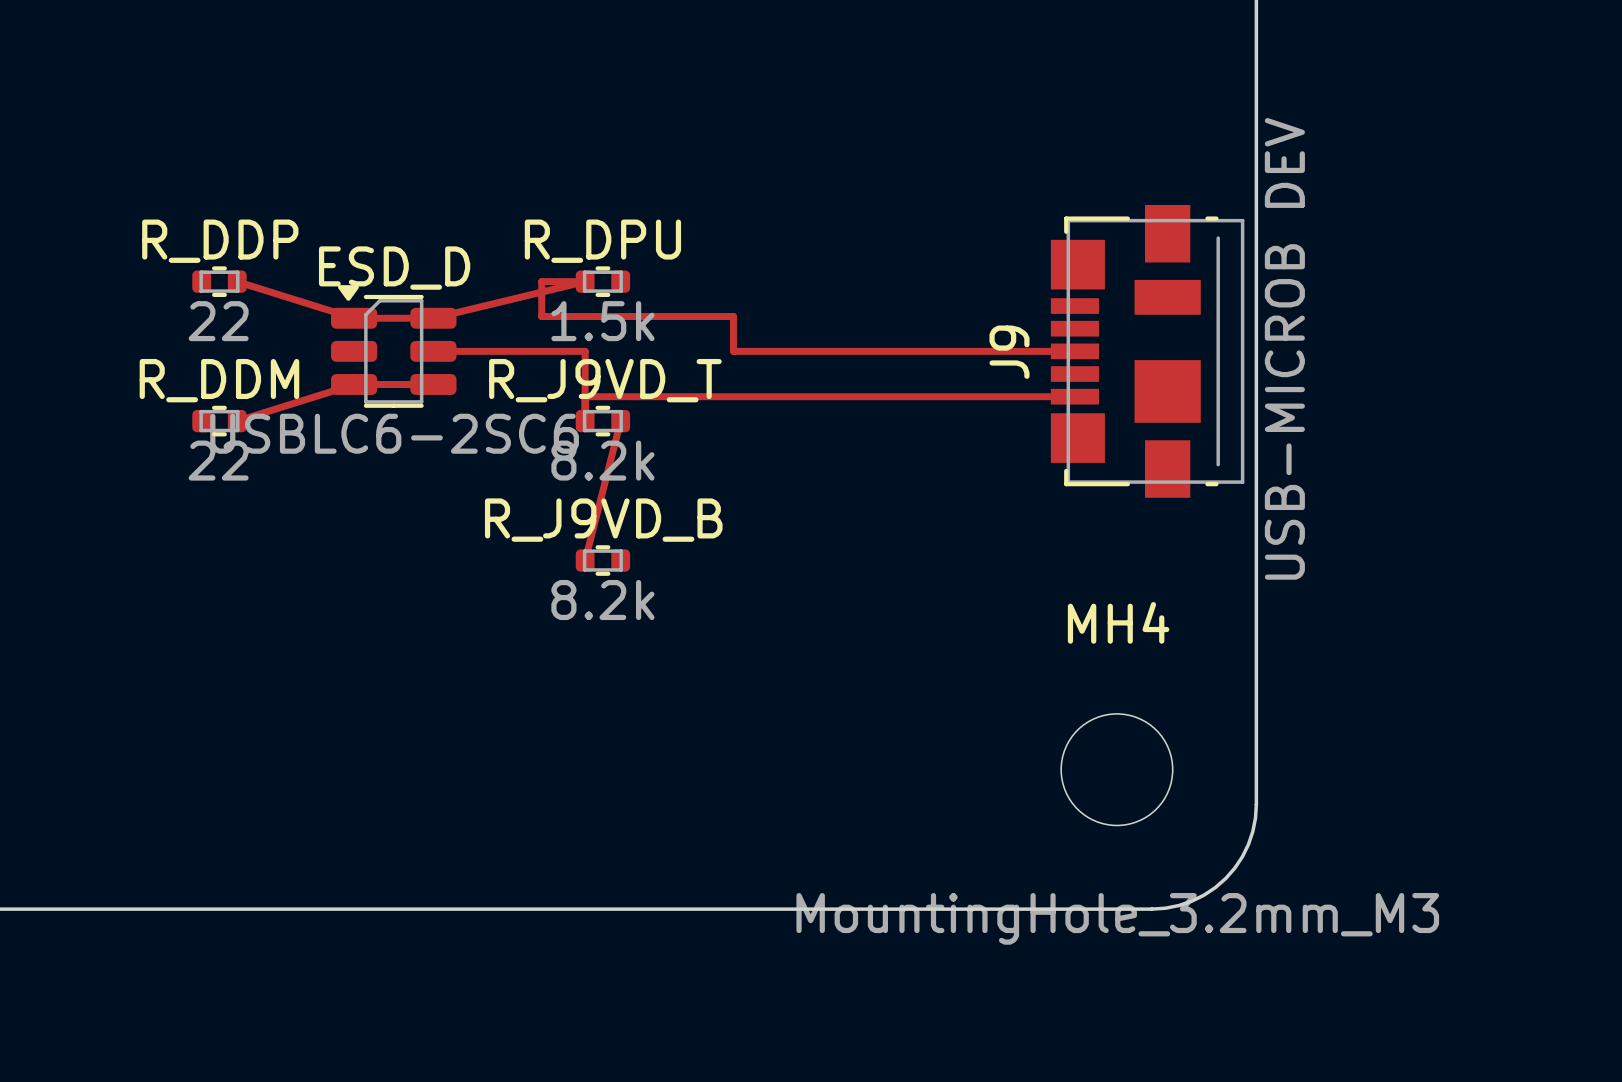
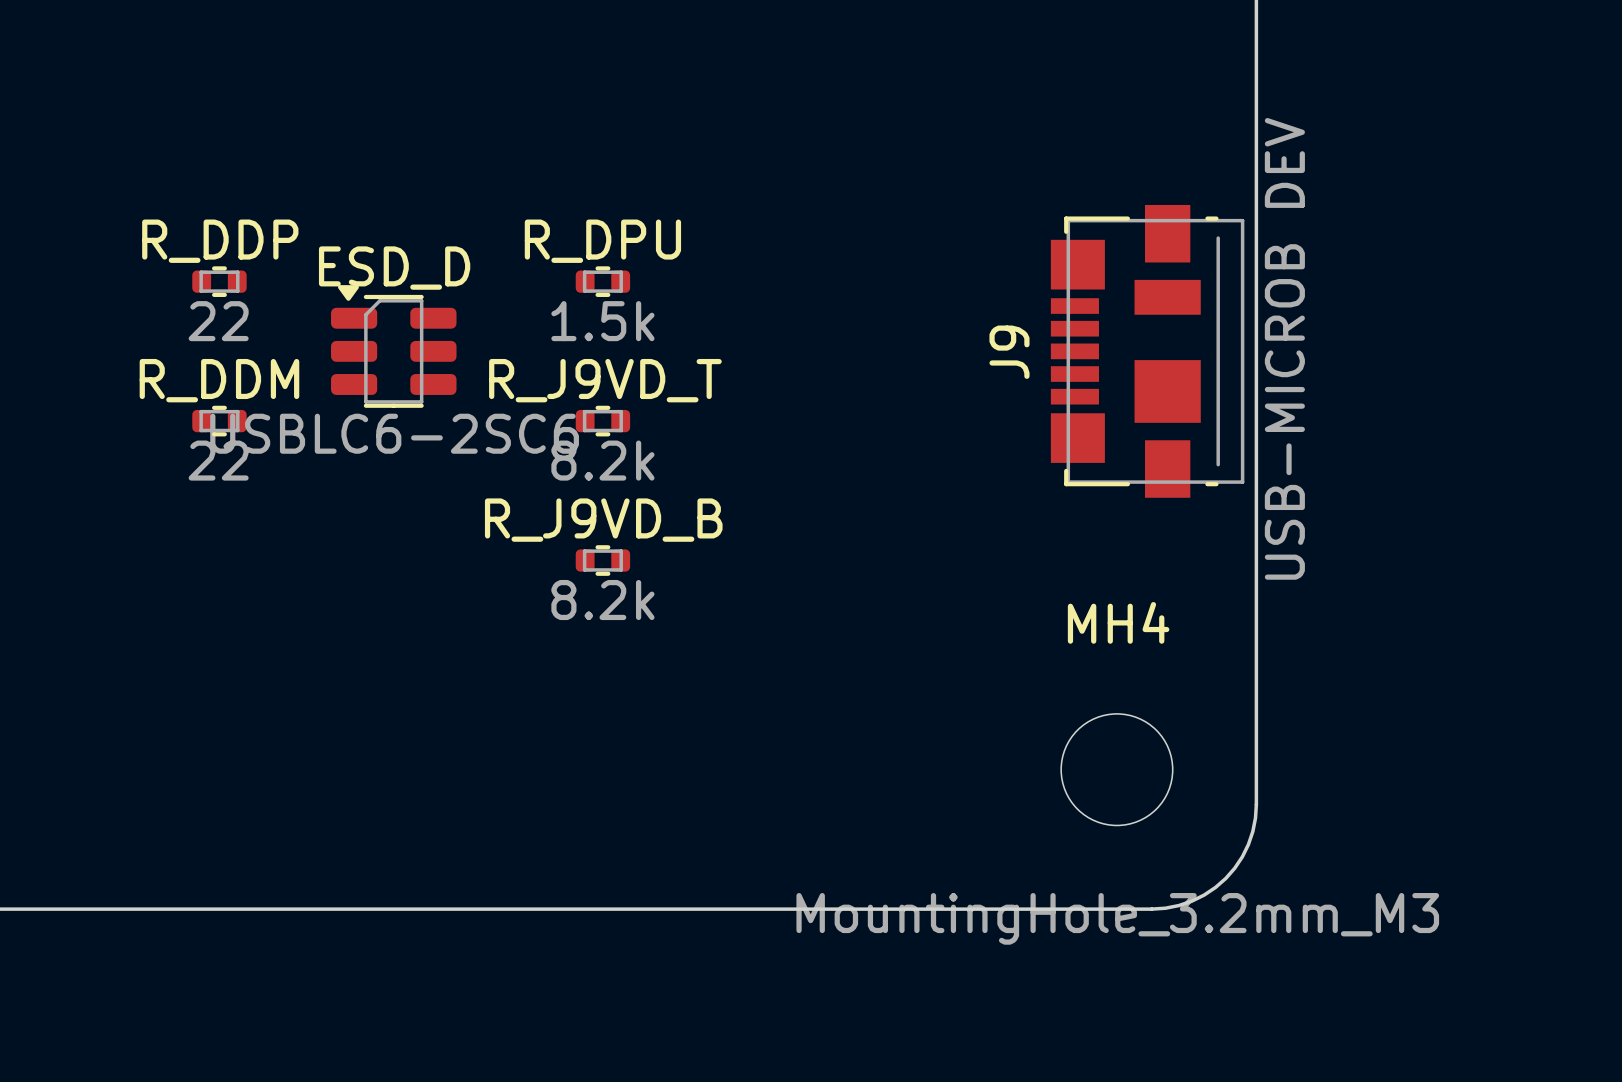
top track: (237, 281) (354, 318) (433, 318) (585, 281) (541, 281) (541, 316) (733, 316) (733, 351) (1074, 351) -> none
top track: (433, 351) (585, 351) (585, 421) -> none
top track: (433, 384) (354, 384) (237, 421) -> none
top track: (585, 396) (1074, 396) -> none
top track: (620, 421) (585, 560) -> none

